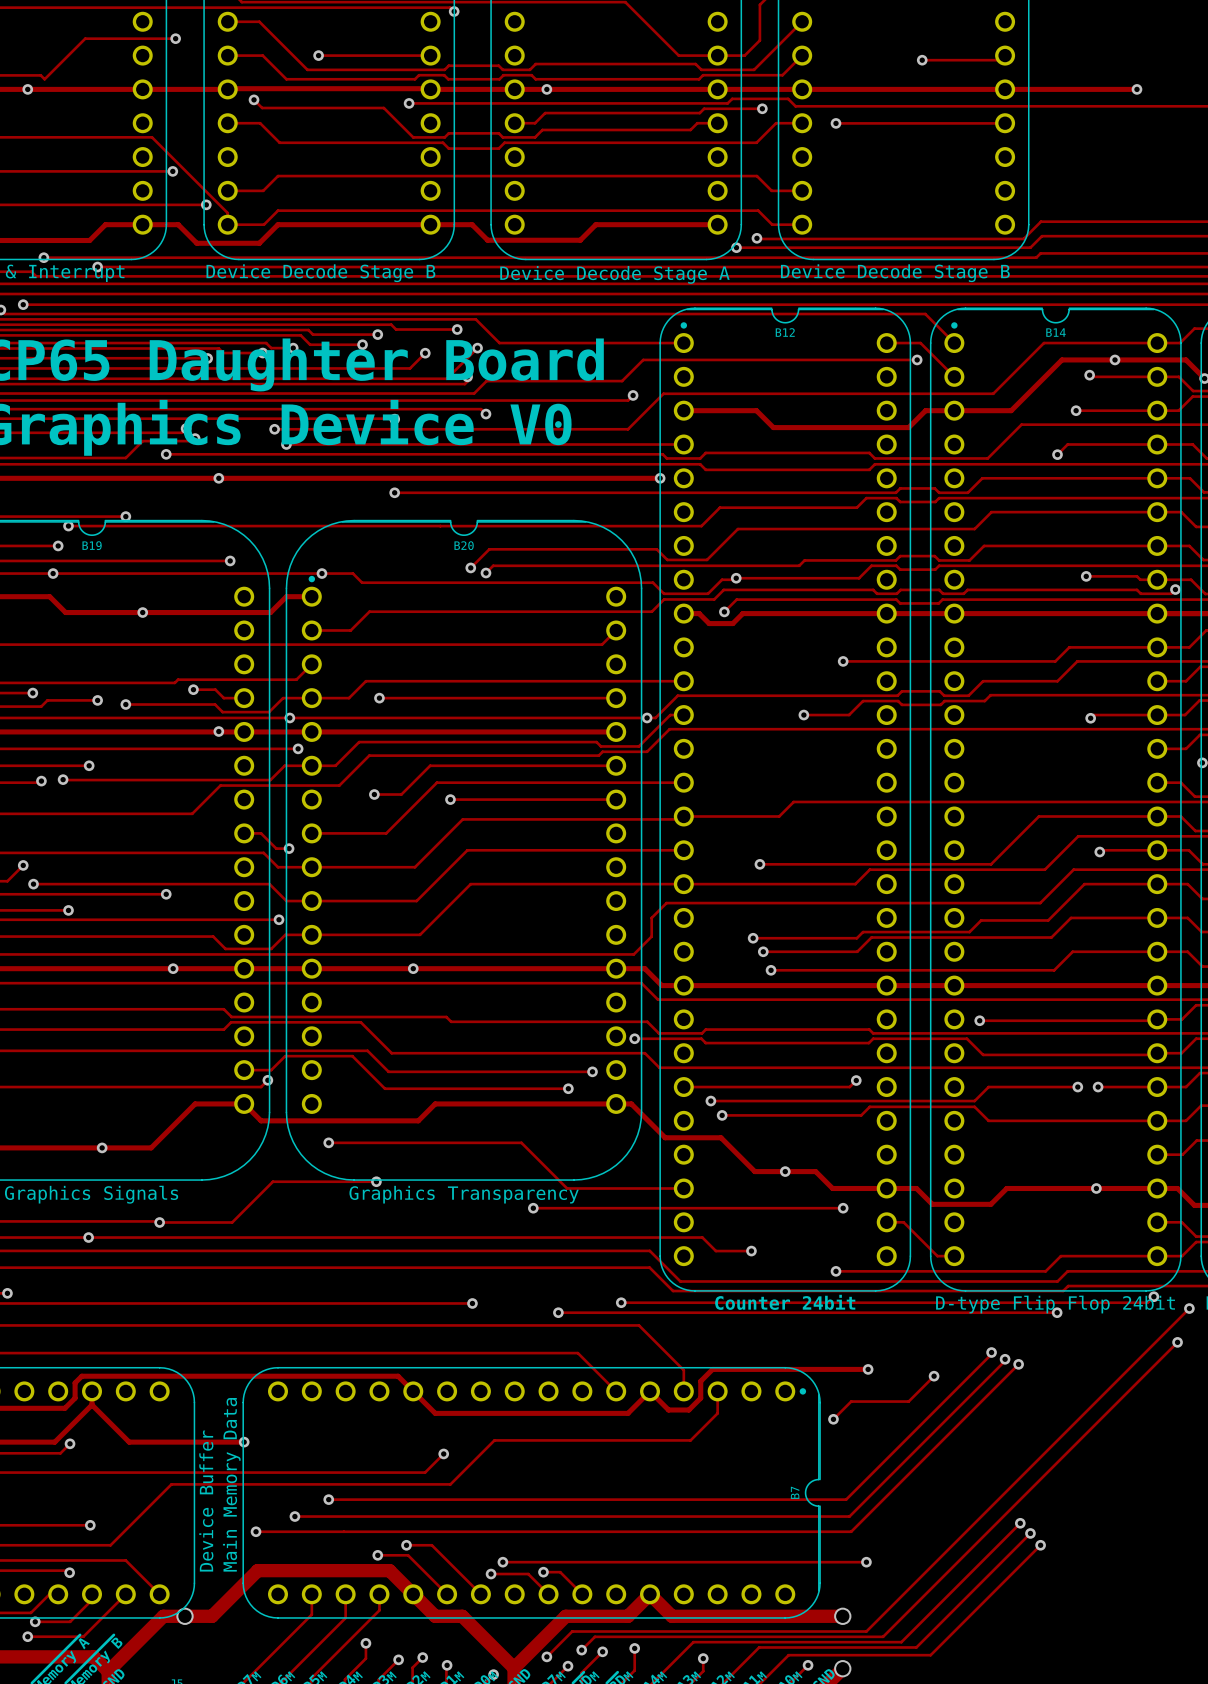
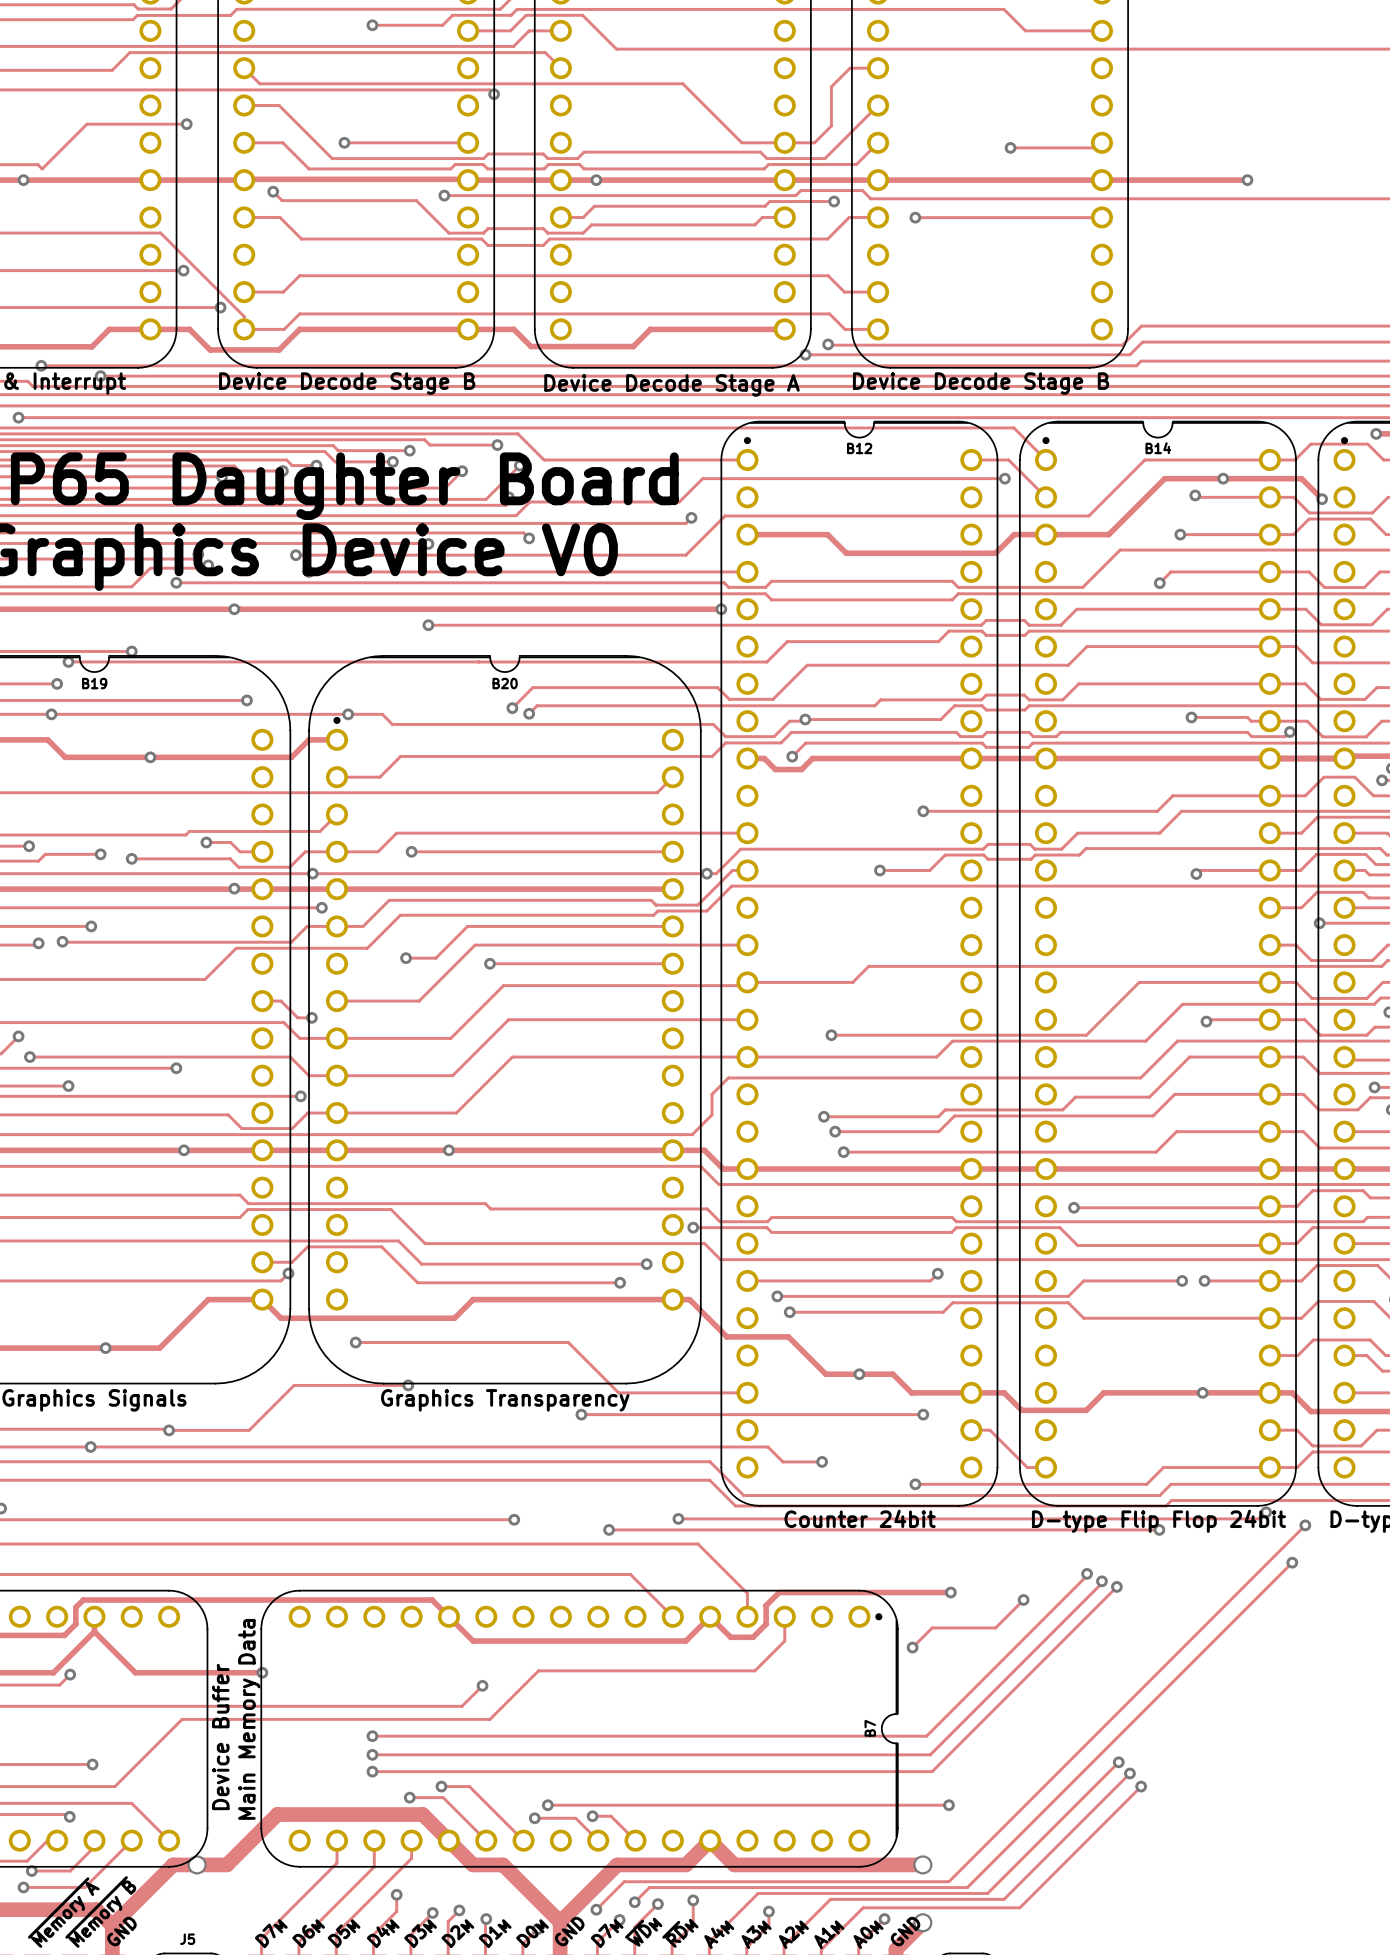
track: (328, 1499) (343, 1499) -> none
via: (328, 1499) -> none
via: none -> (372, 1736)
track: (294, 1516) (343, 1516) -> none
via: (294, 1516) -> none
via: none -> (372, 1754)
track: (256, 1531) (343, 1531) -> none
via: (256, 1531) -> none
via: none -> (372, 1771)

